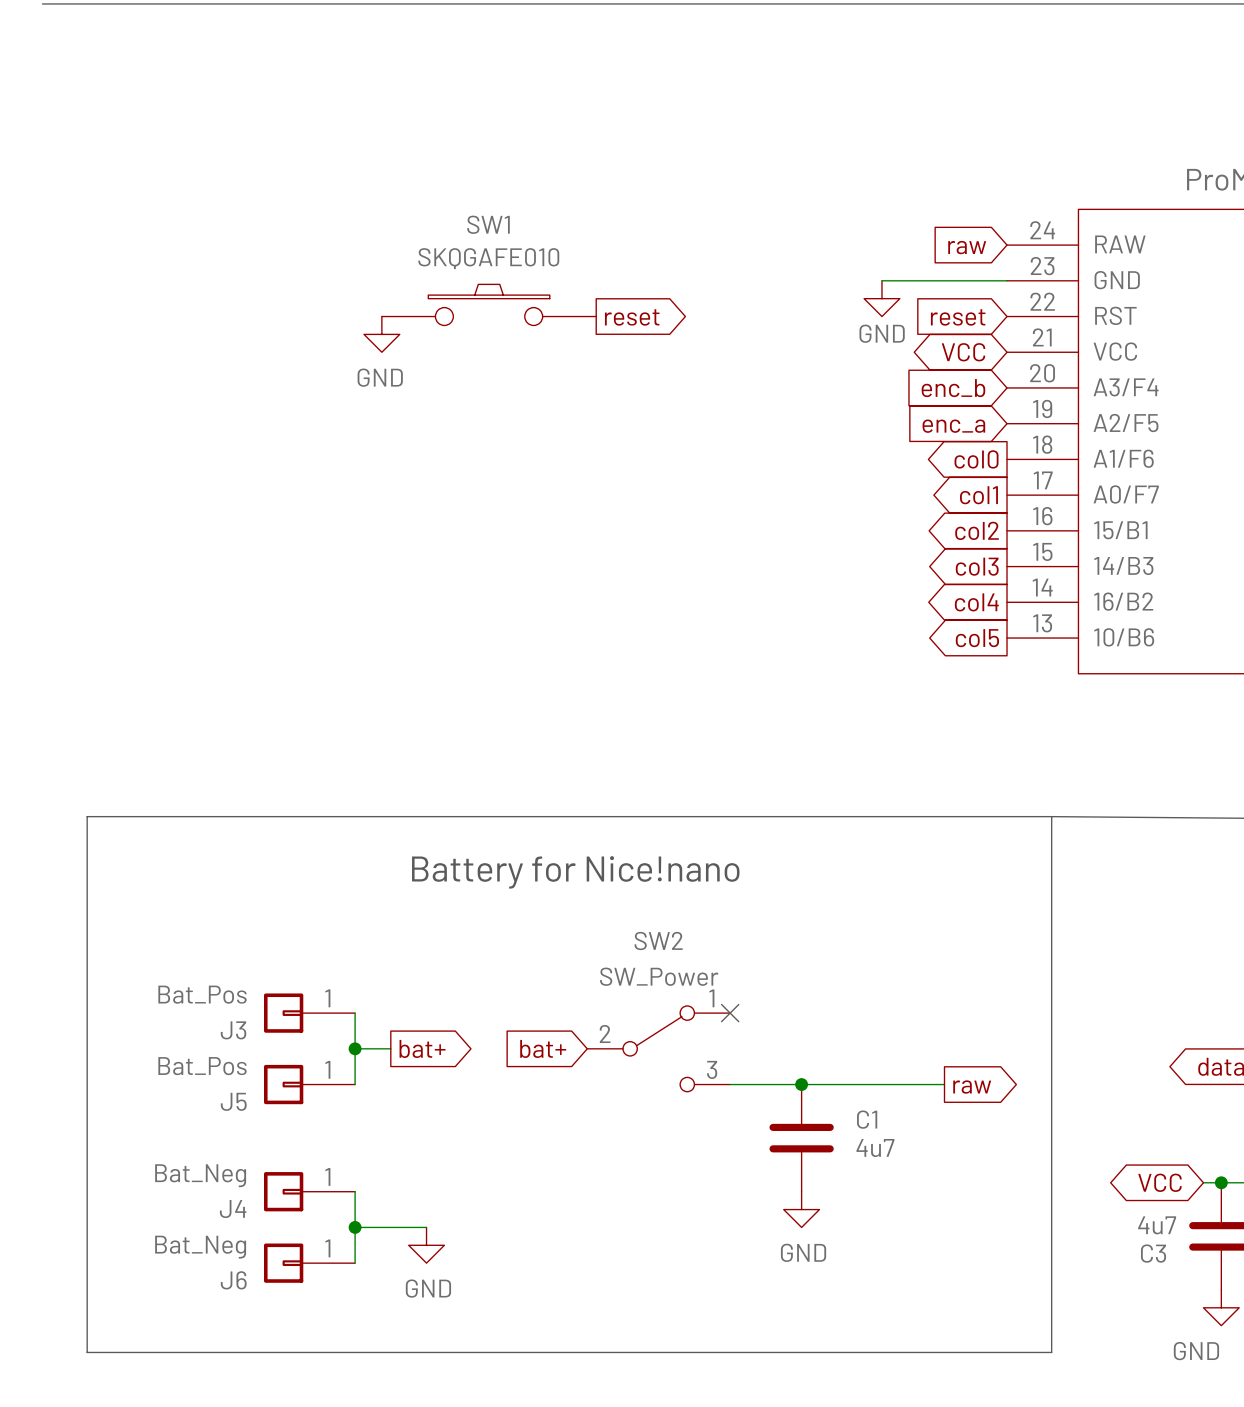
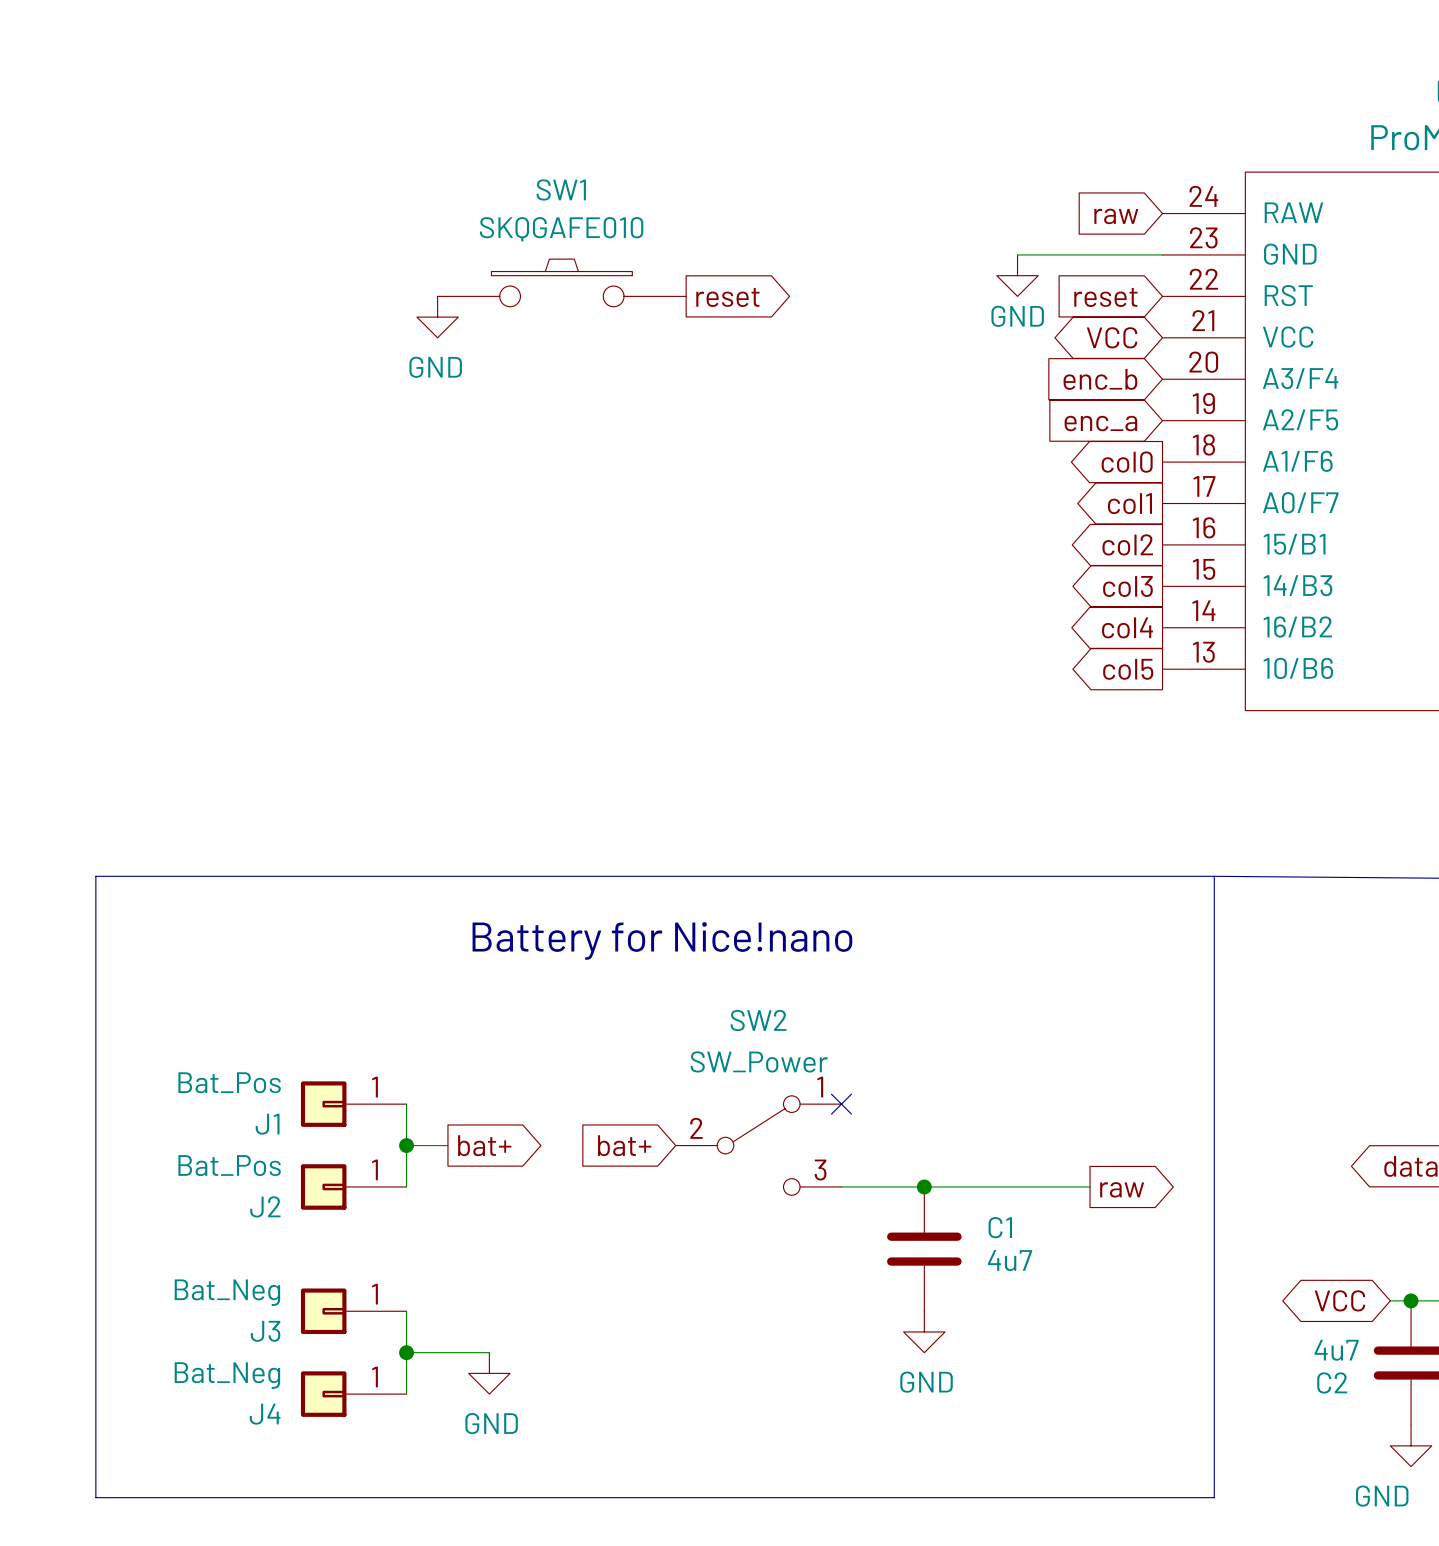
J3 name: J3 (233, 1030) -> J1 (267, 1124)
J5 name: J5 (233, 1101) -> J2 (265, 1206)
J4 name: J4 (233, 1209) -> J3 (265, 1331)
C3 name: C3 (1153, 1253) -> C2 (1332, 1382)
J6 name: J6 (233, 1280) -> J4 (265, 1414)

